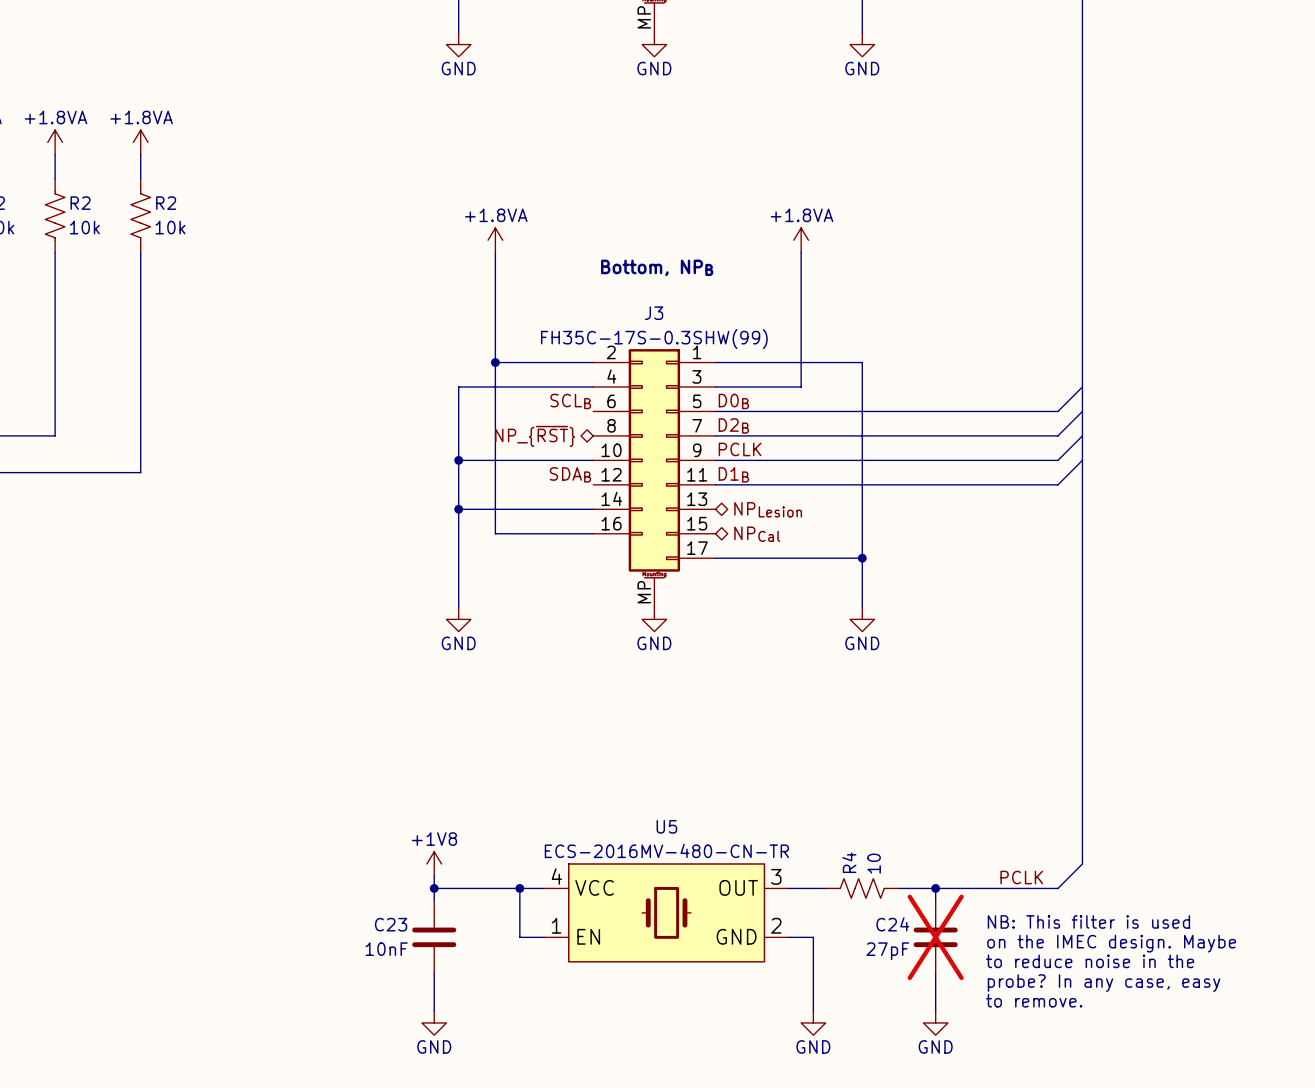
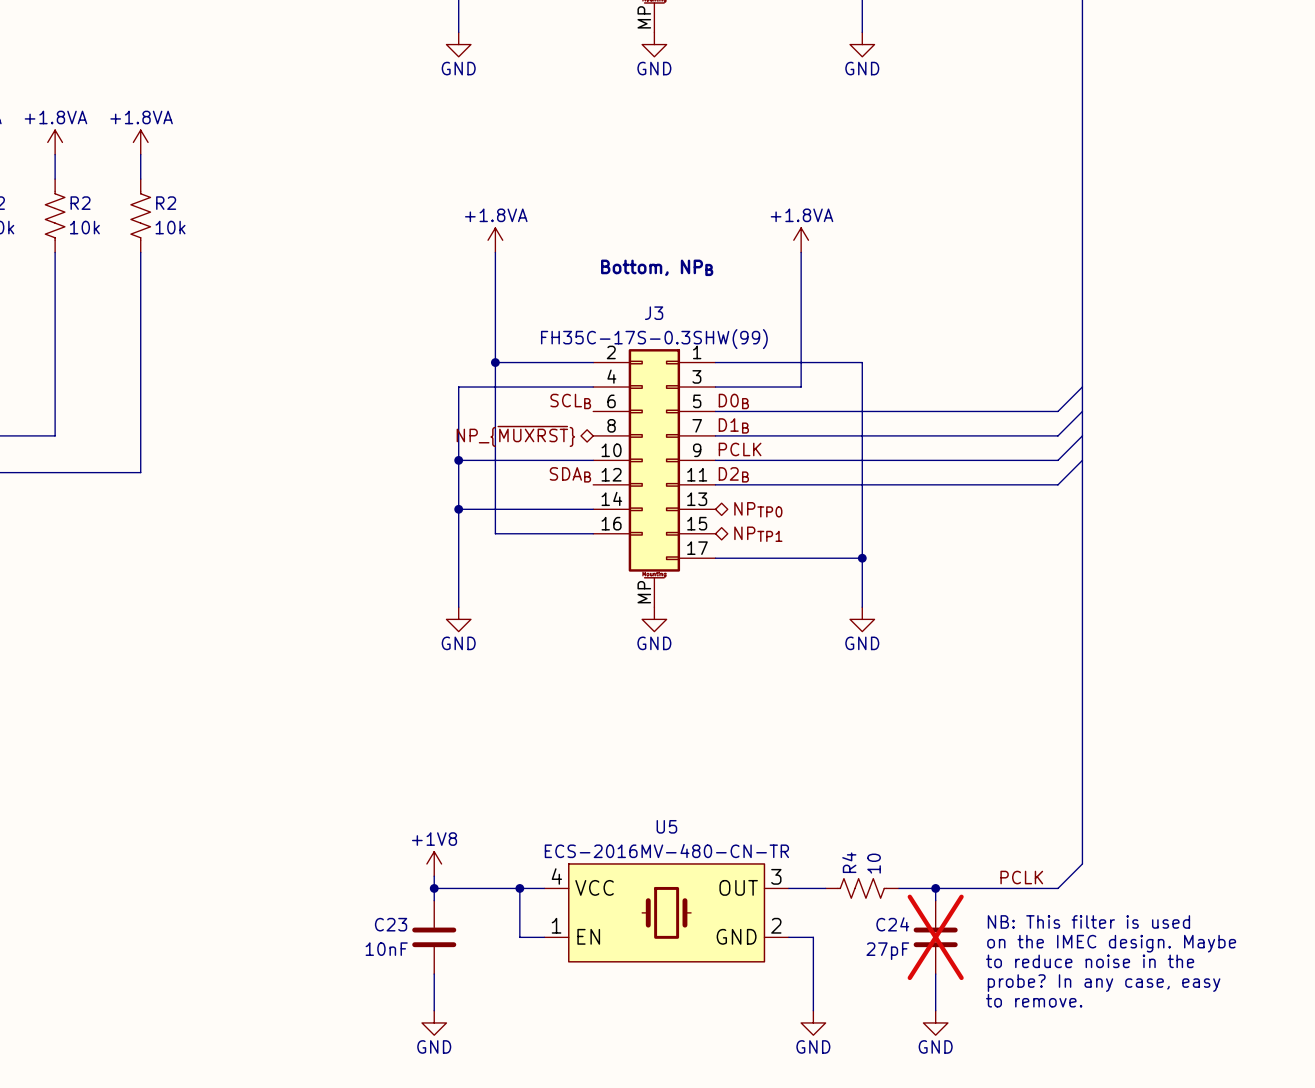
label: D2B (733, 425) -> D1B (733, 425)
hierarchical label: NP_{~{RST}} (535, 436) -> NP_{~{MUXRST}} (515, 436)
label: D1B (733, 474) -> D2B (733, 474)
hierarchical label: NPLesion (768, 509) -> NPTP0 (758, 509)
hierarchical label: NPCal (757, 534) -> NPTP1 (758, 534)

